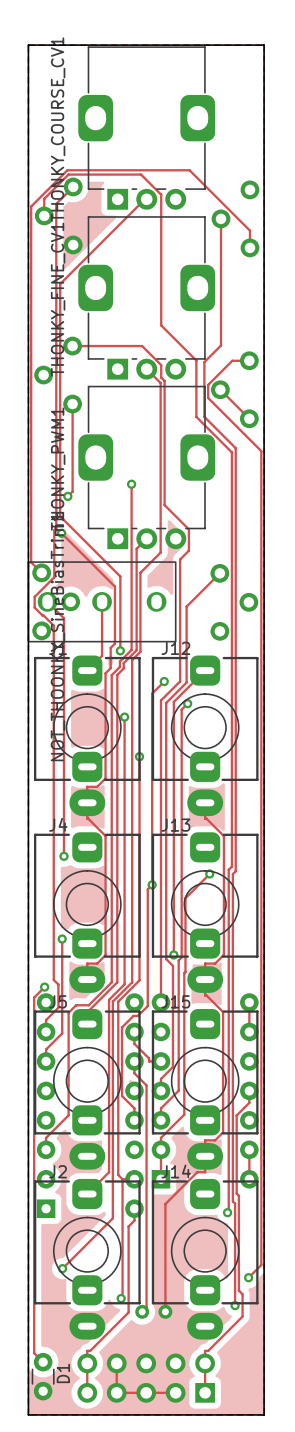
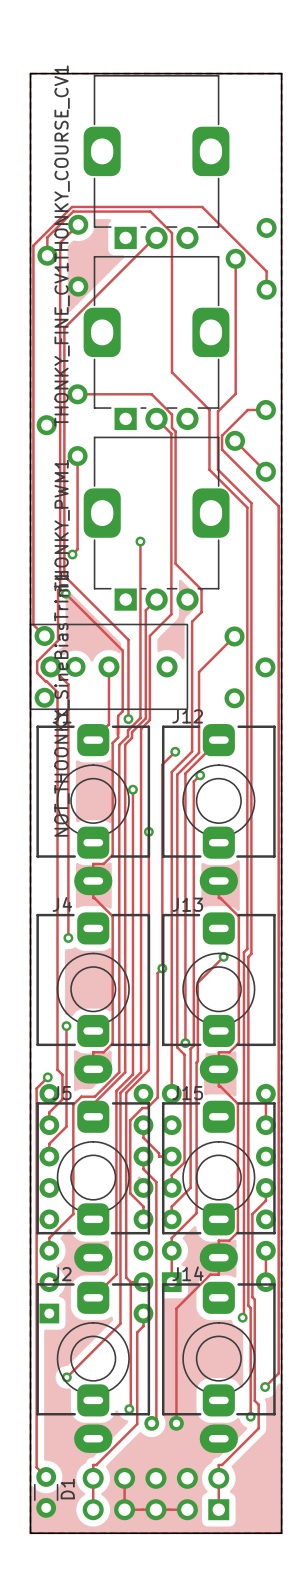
part footprint: [27, 561, 177, 643] -> [29, 623, 189, 710]

